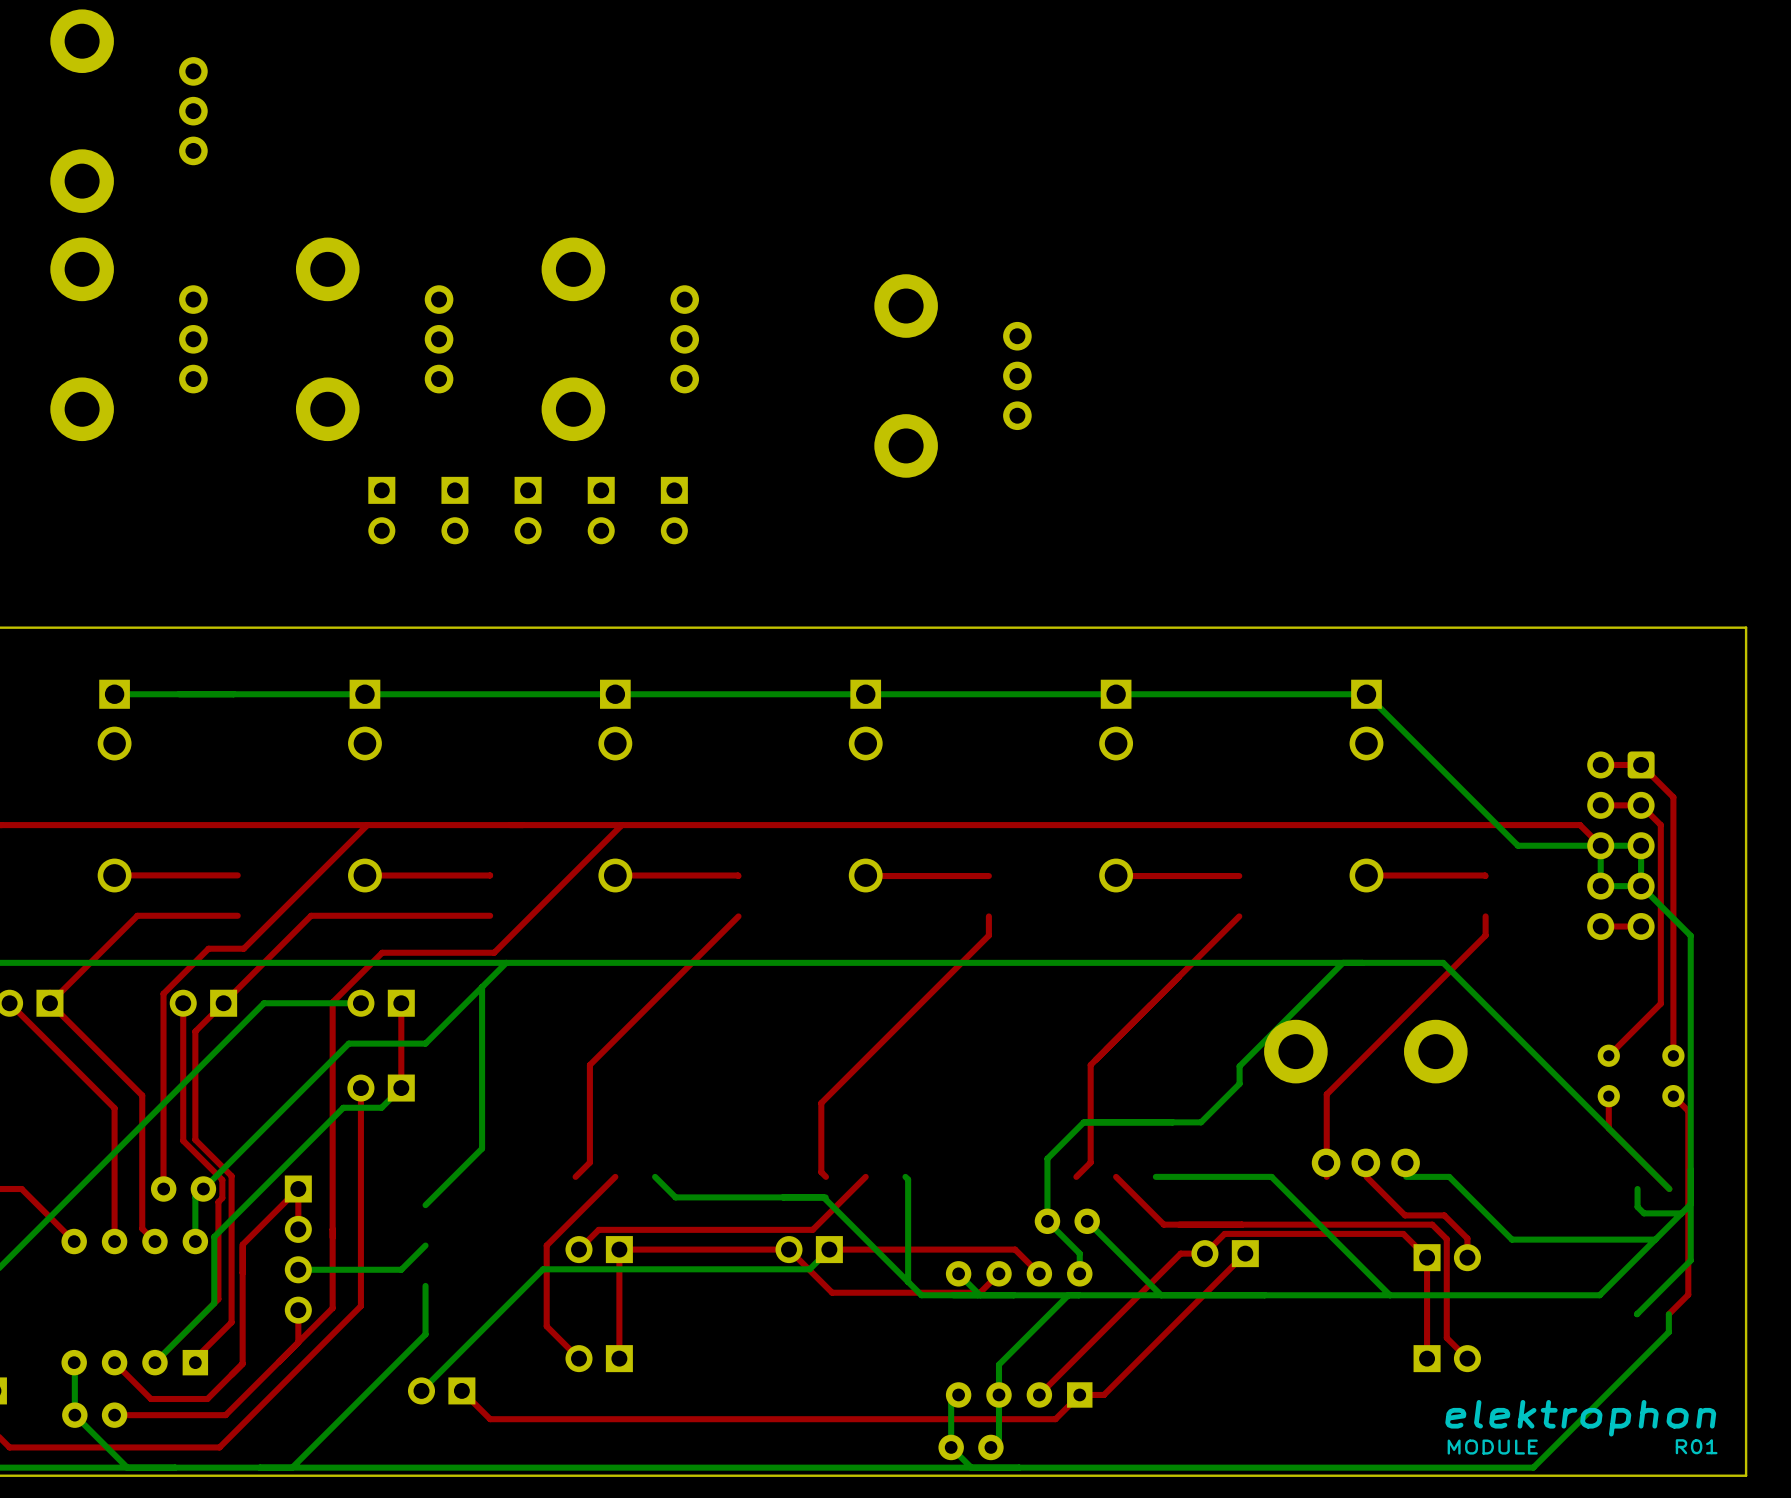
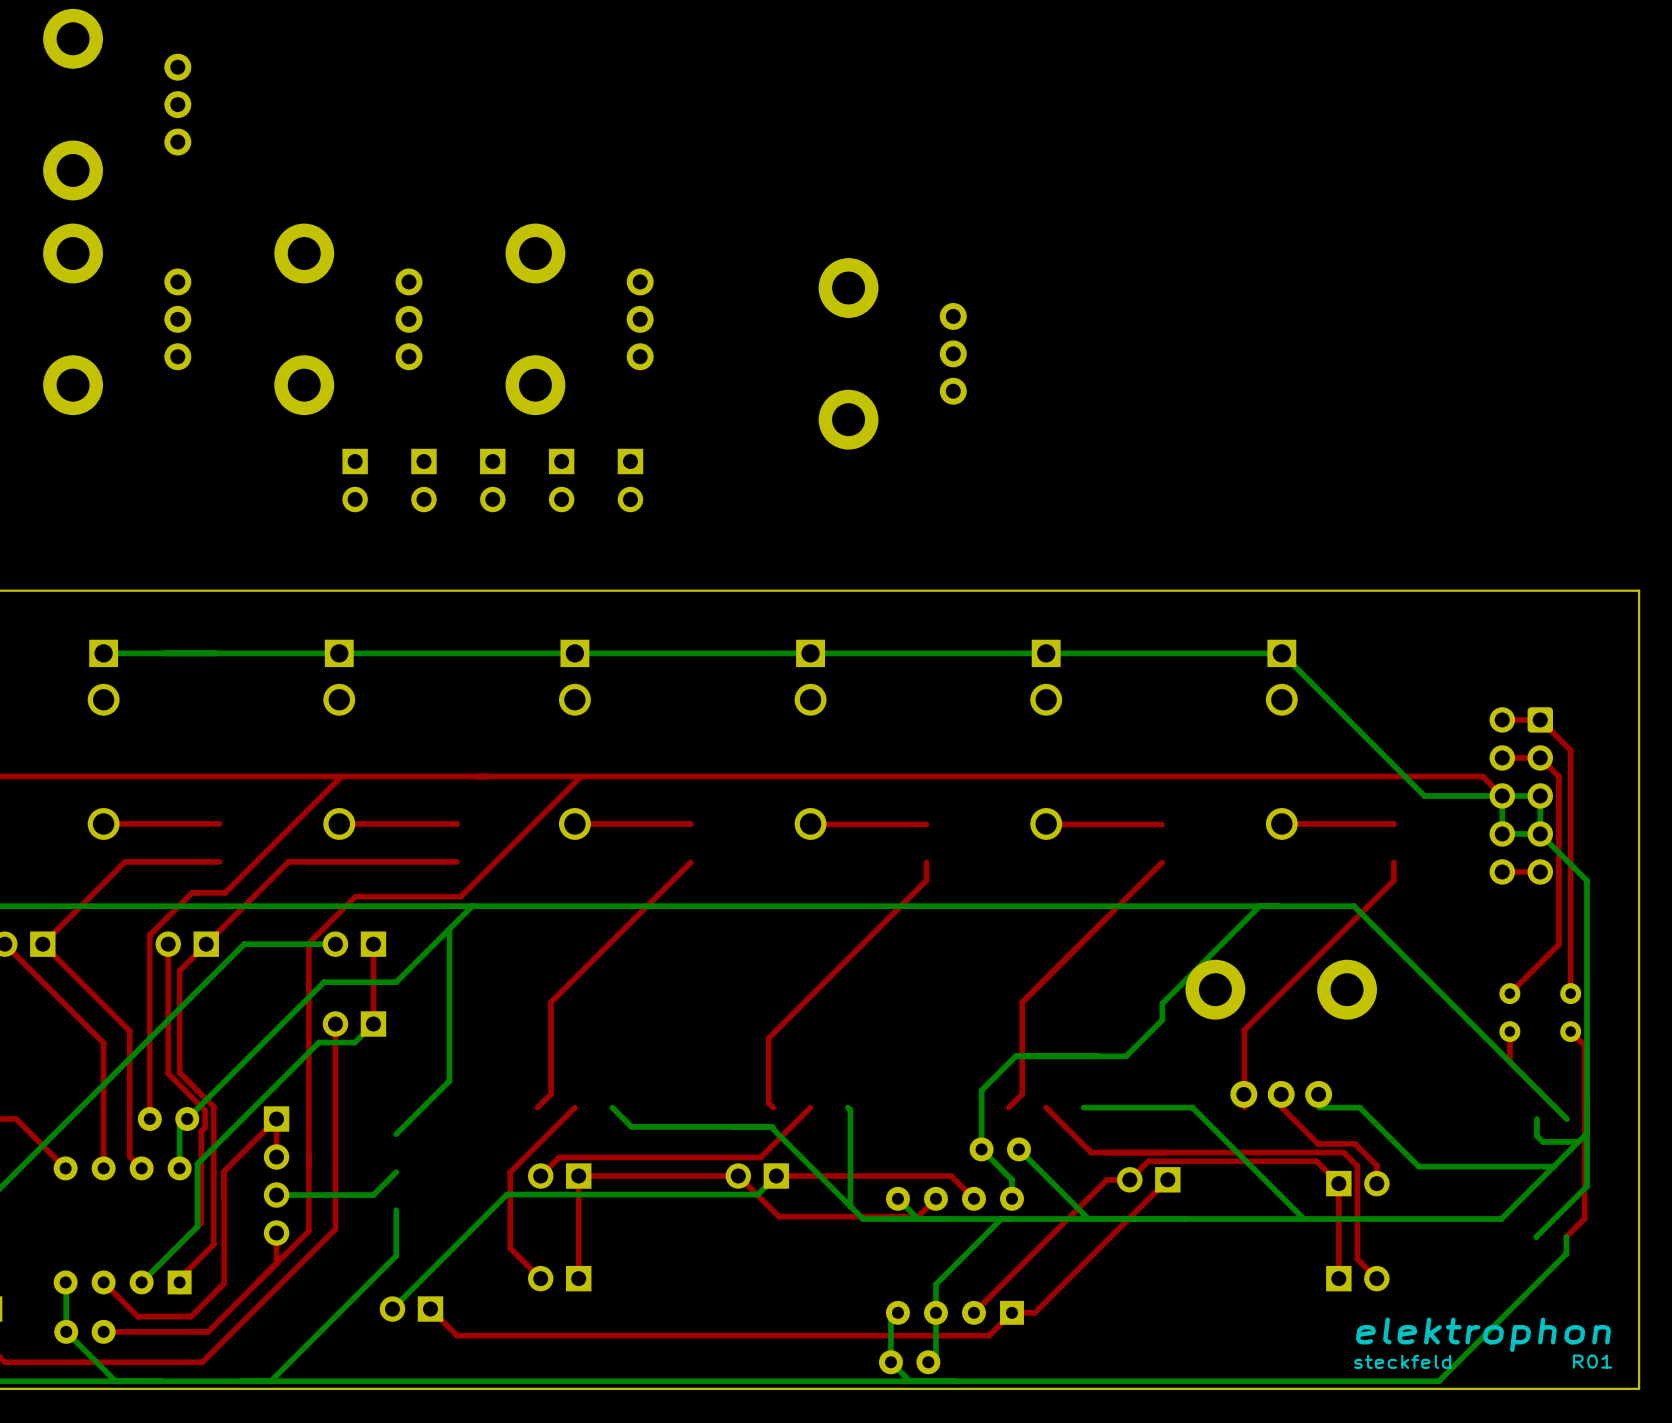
drawing shape: [1445, 1399, 1718, 1455] -> [1354, 1317, 1613, 1369]

